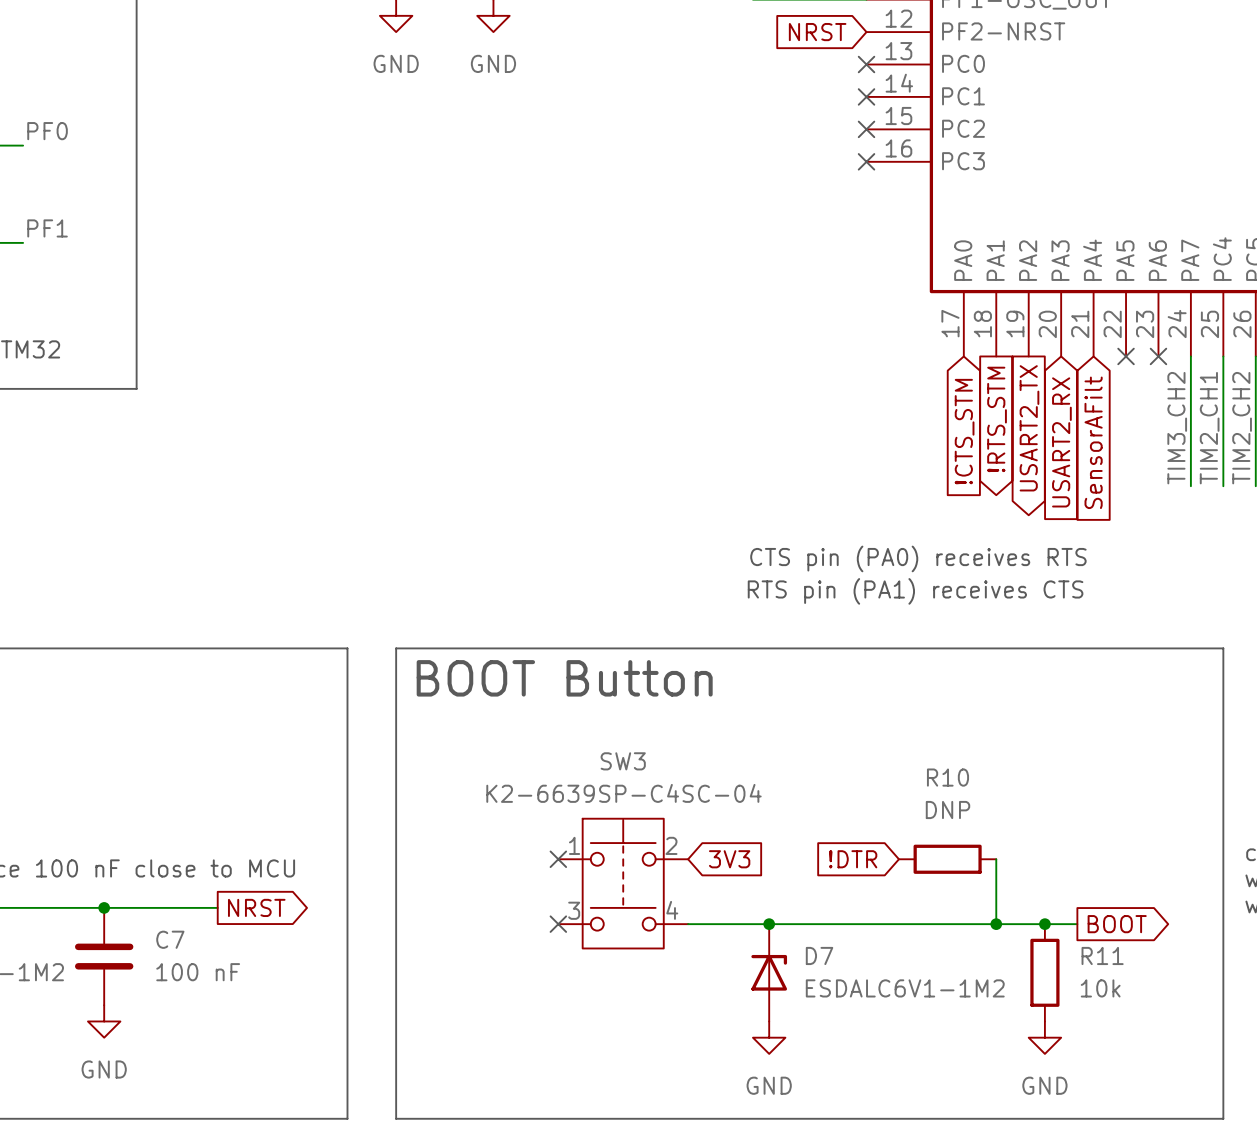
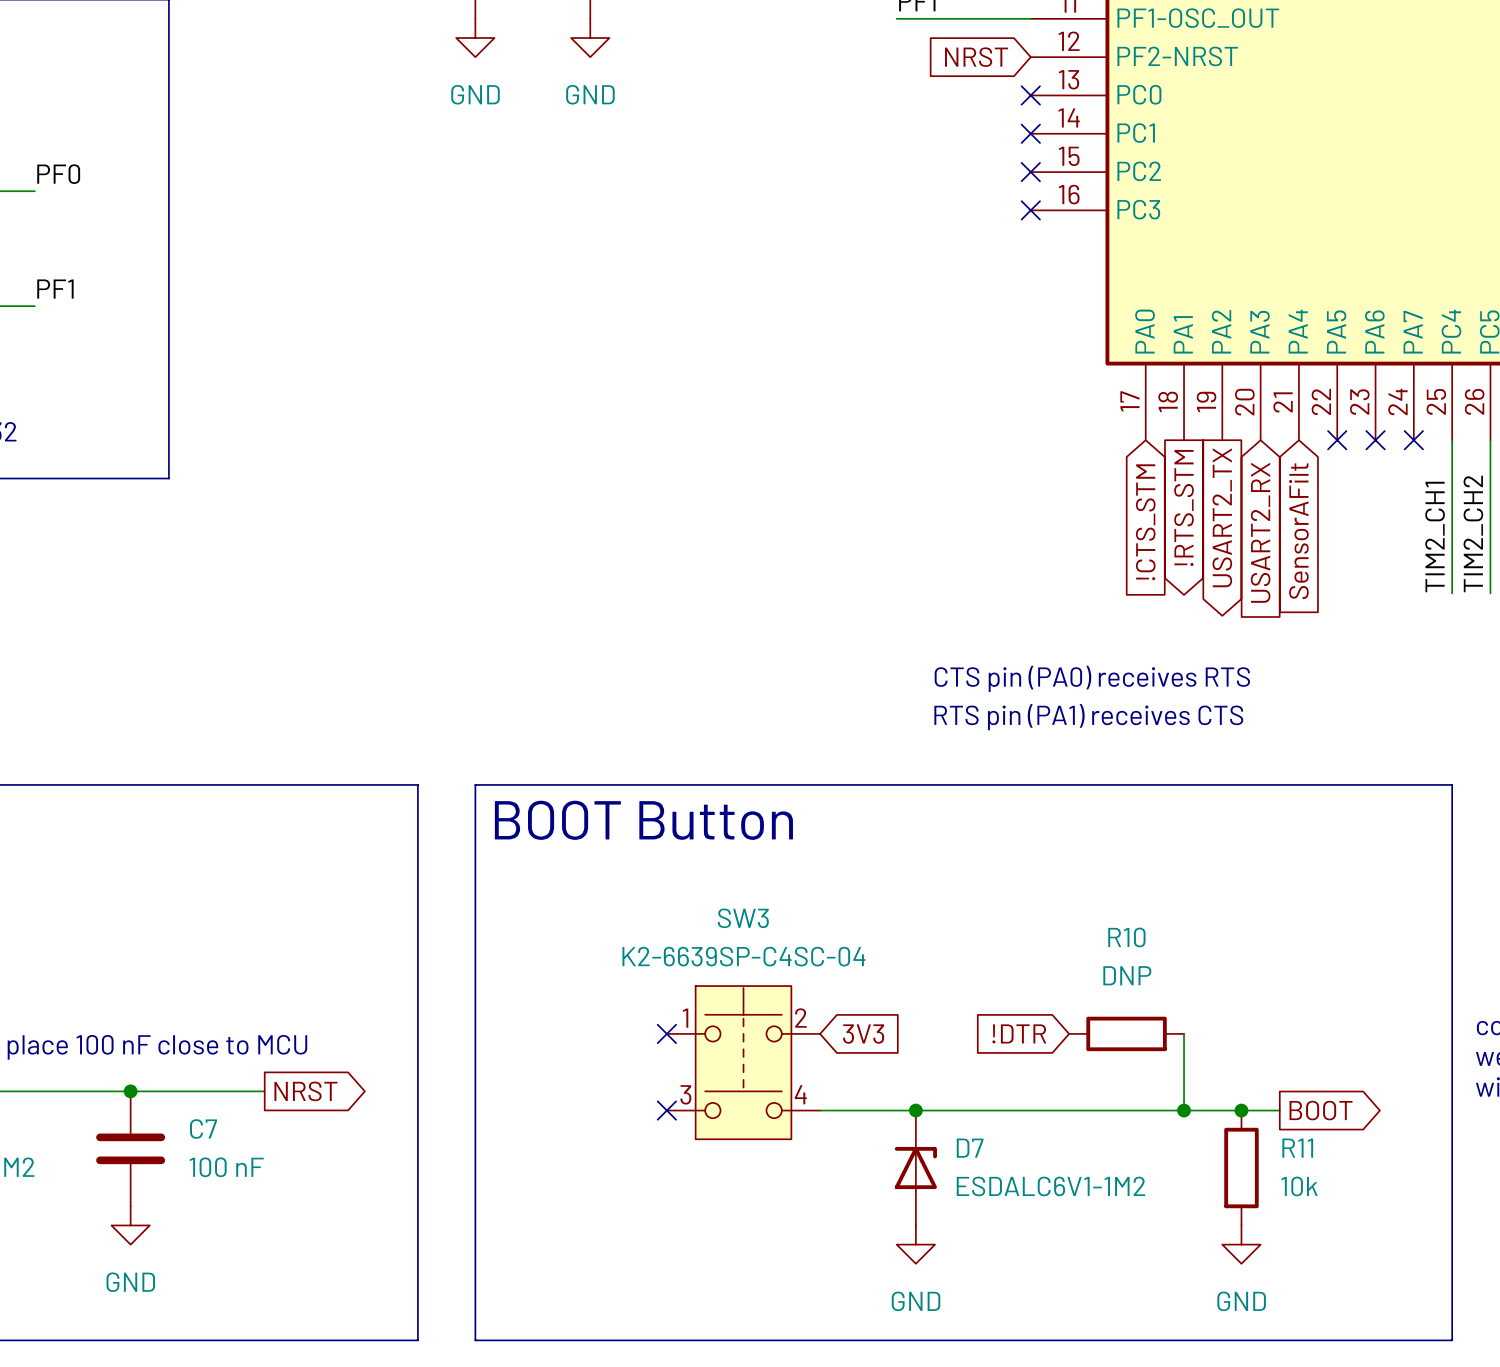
wire: (1190, 356) (1190, 486) -> none
no-connect mark: none -> (1413, 440)
label: TIM3_CH2 (1177, 428) -> none

